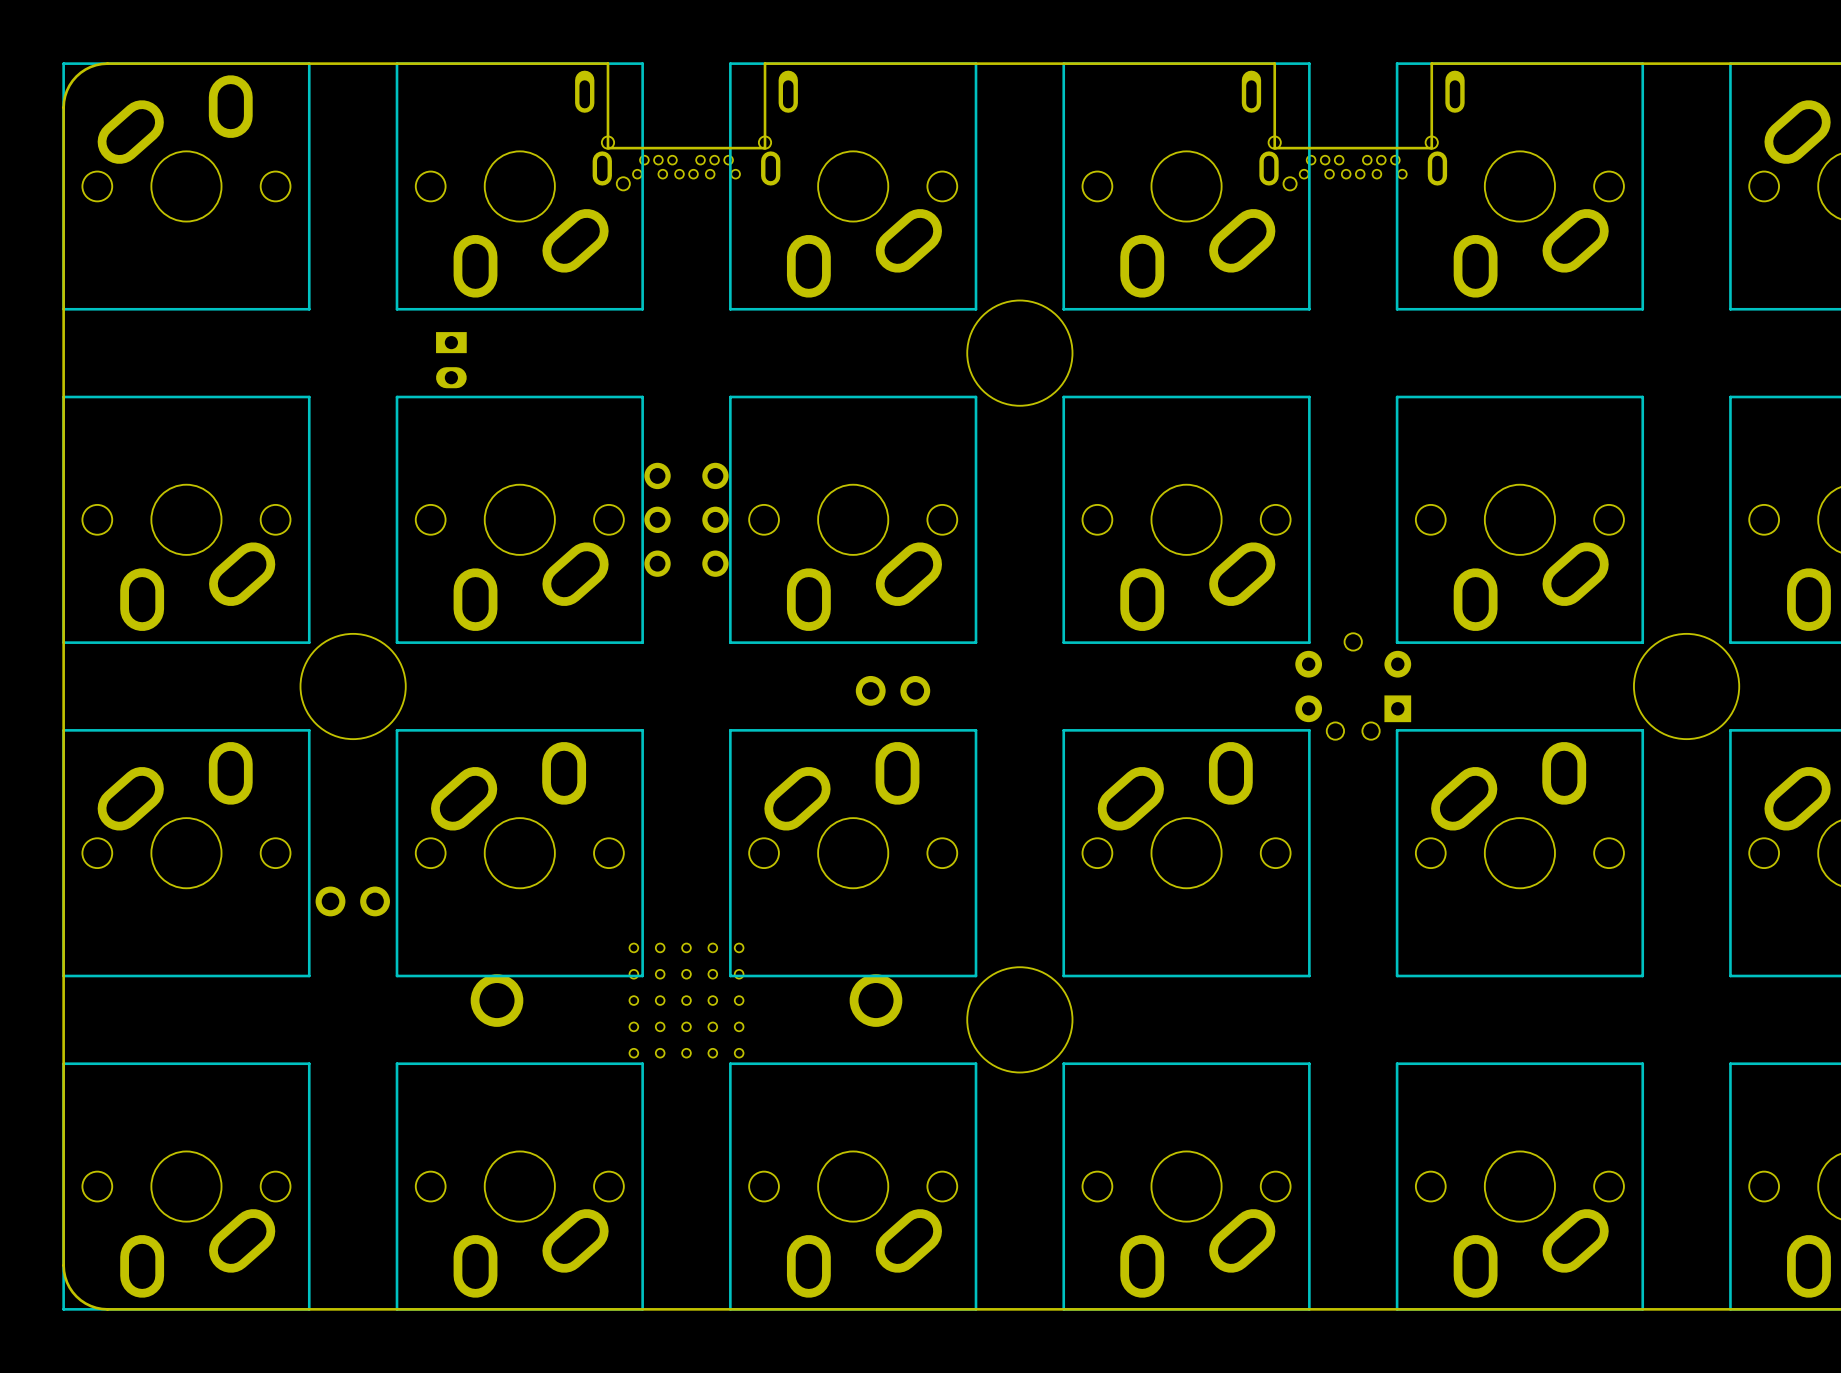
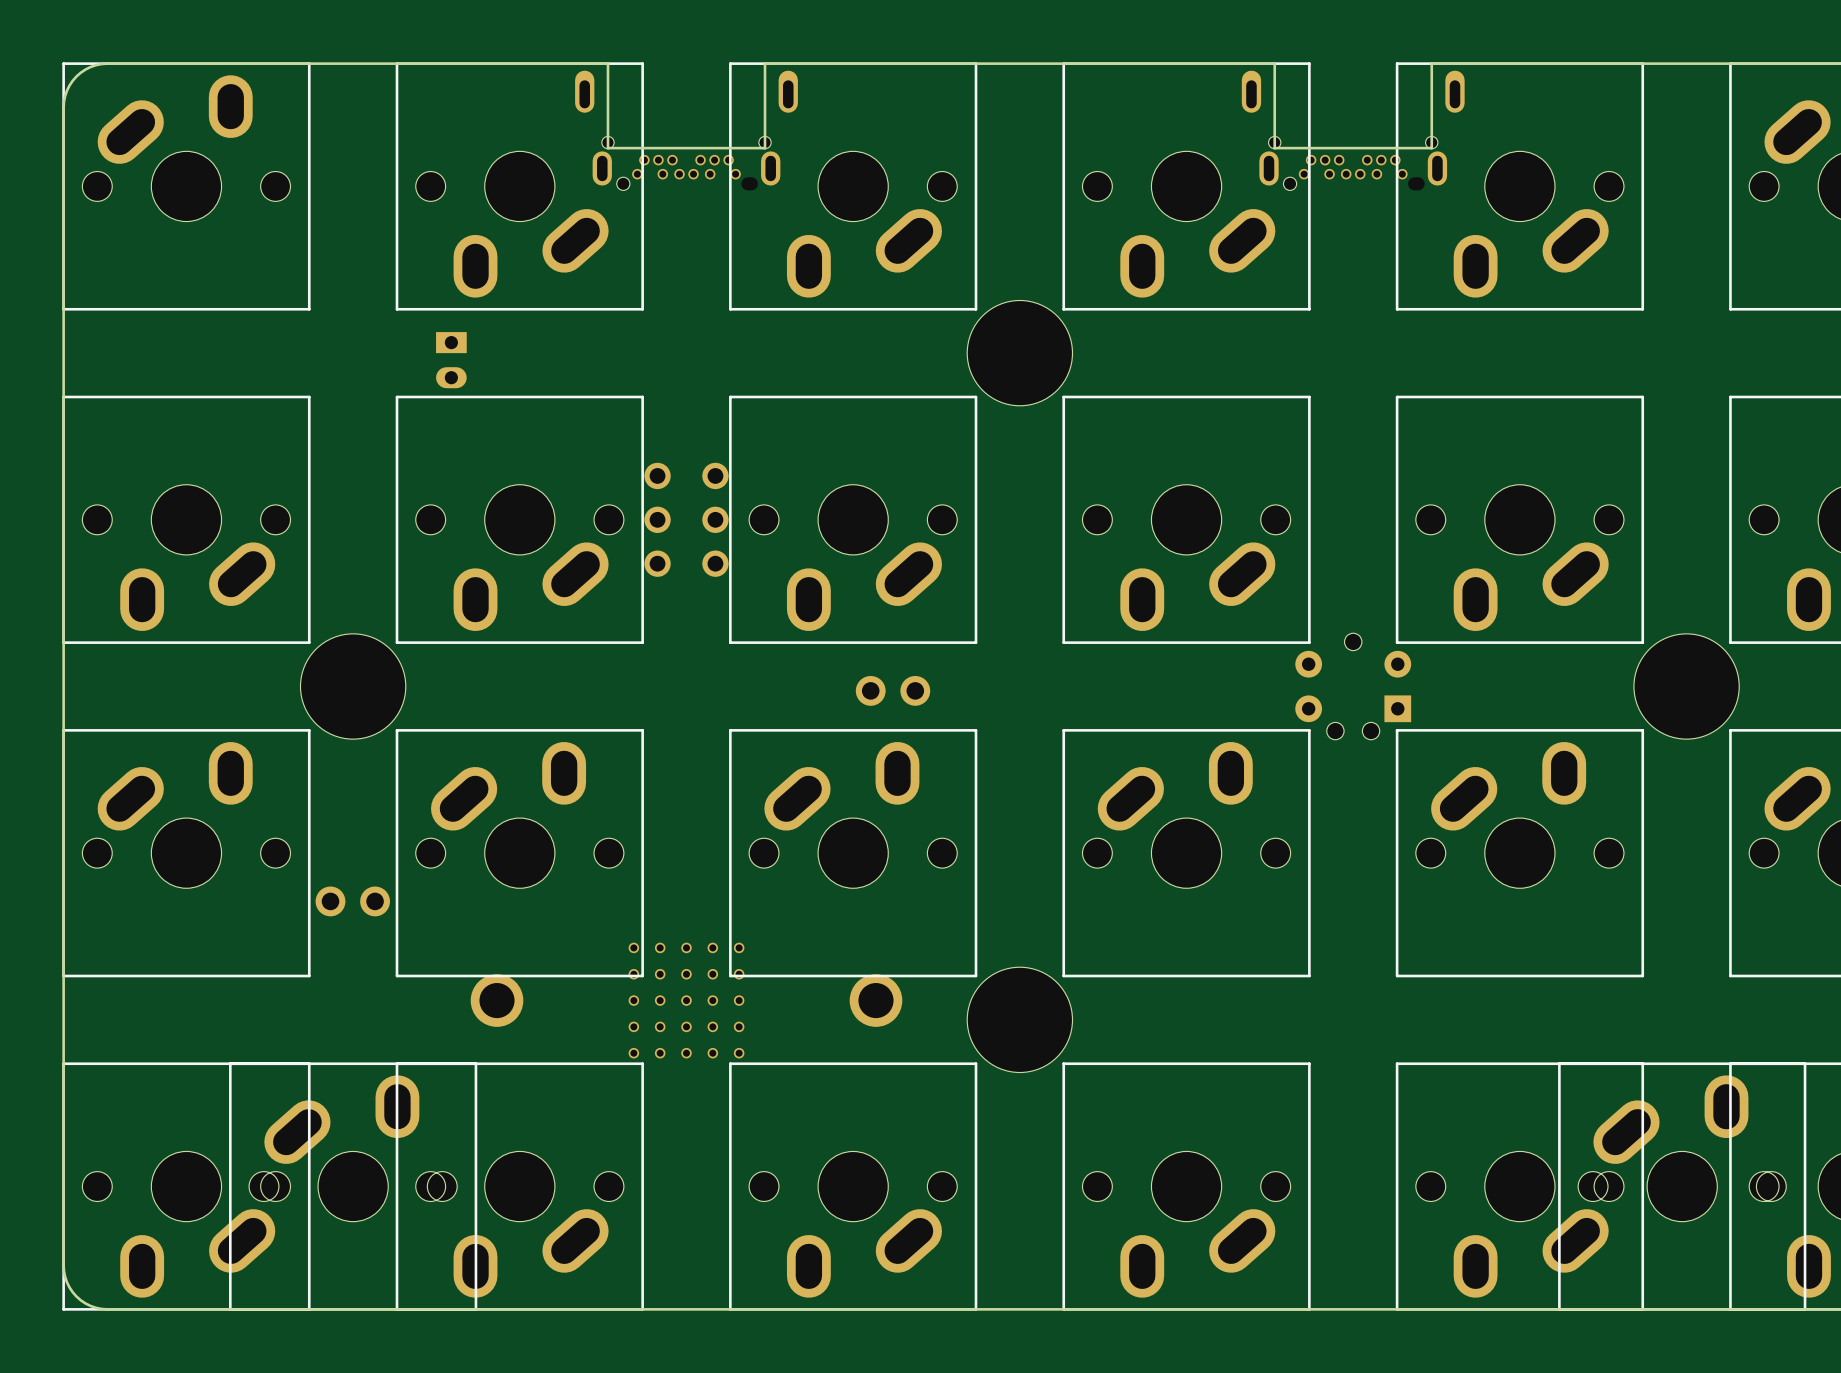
part: none -> (353, 1186)
part: none -> (1682, 1186)

